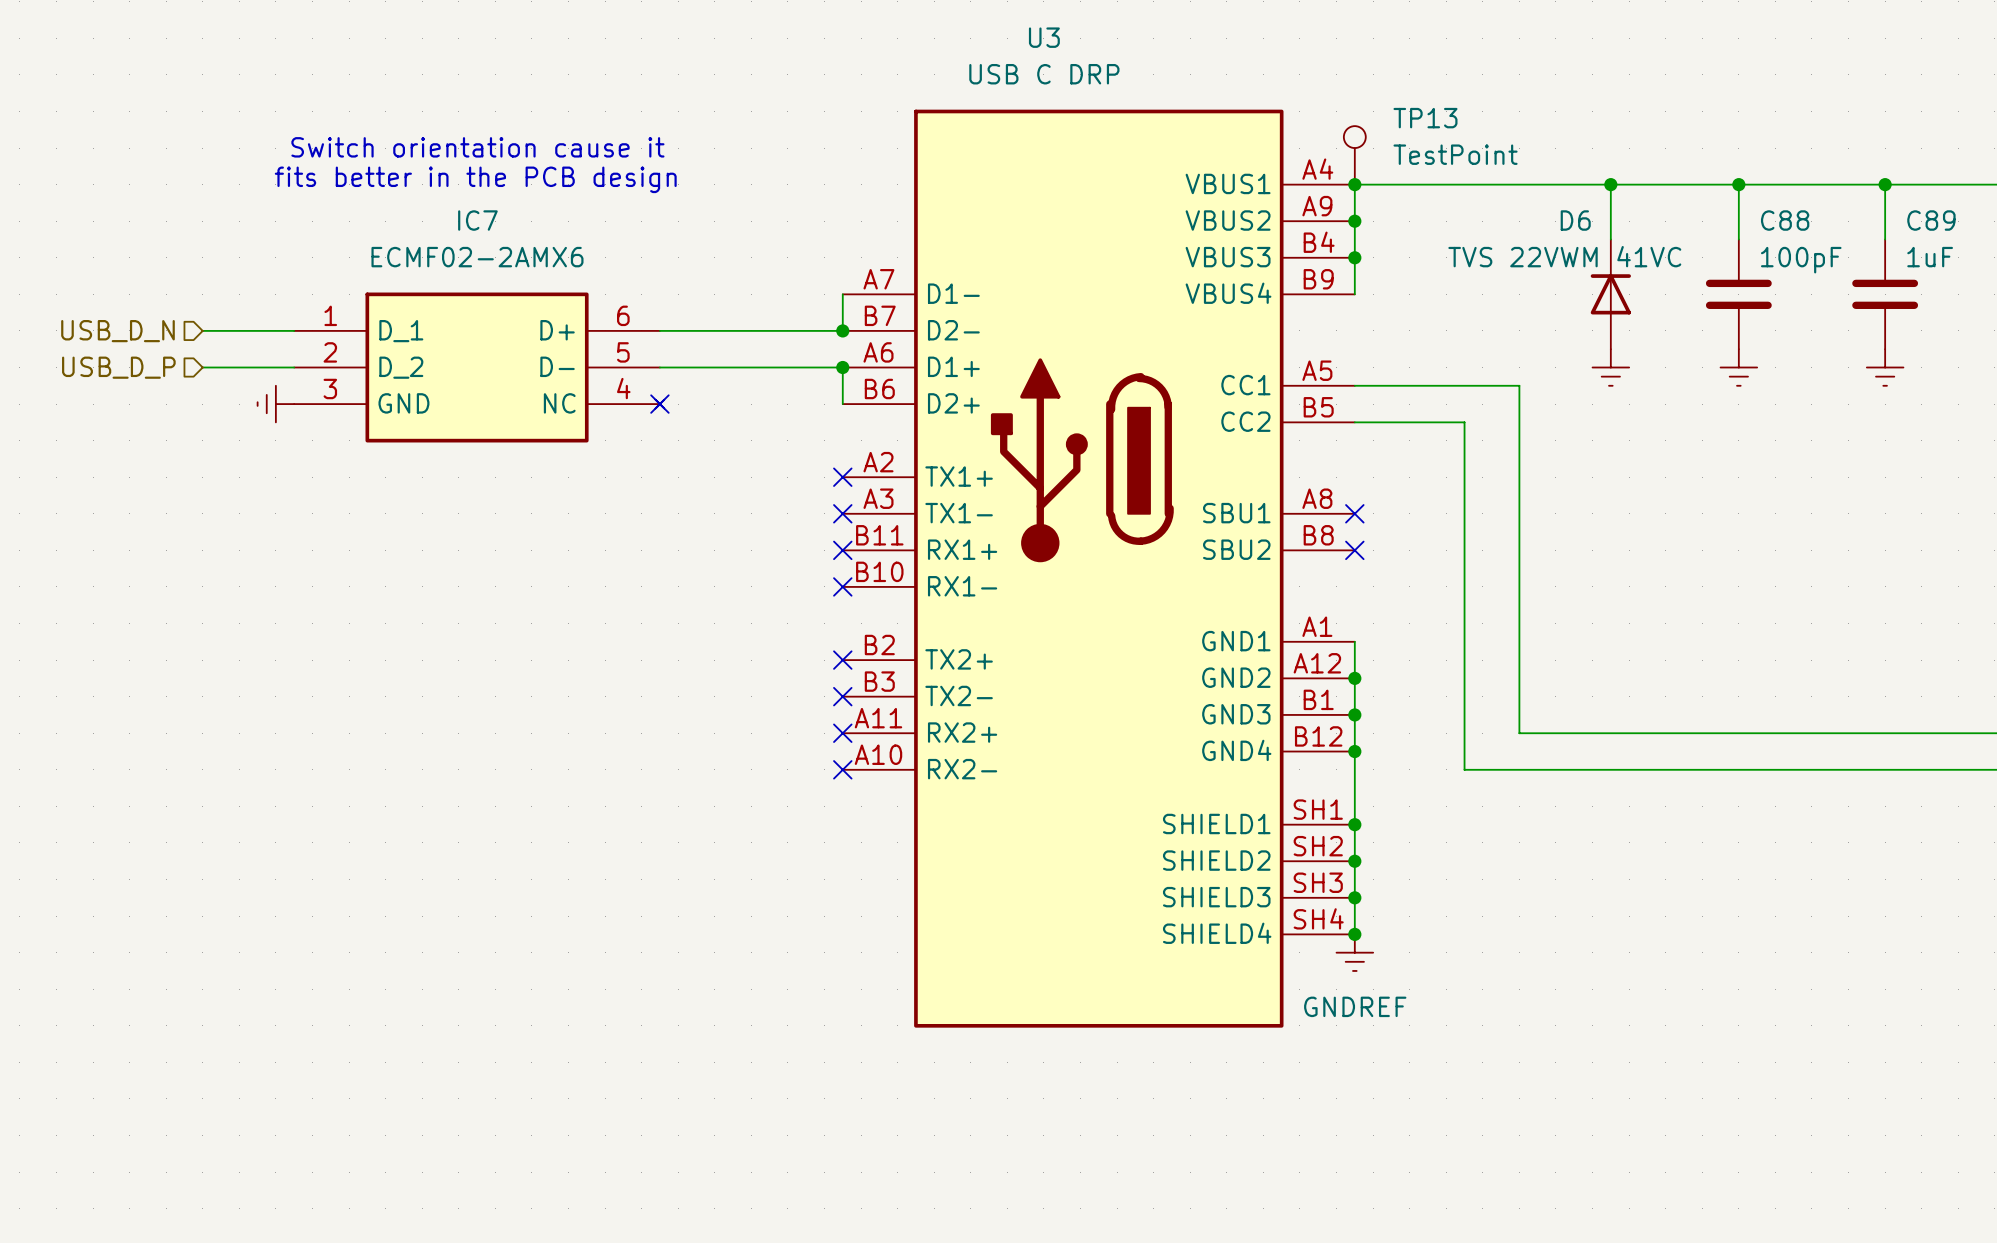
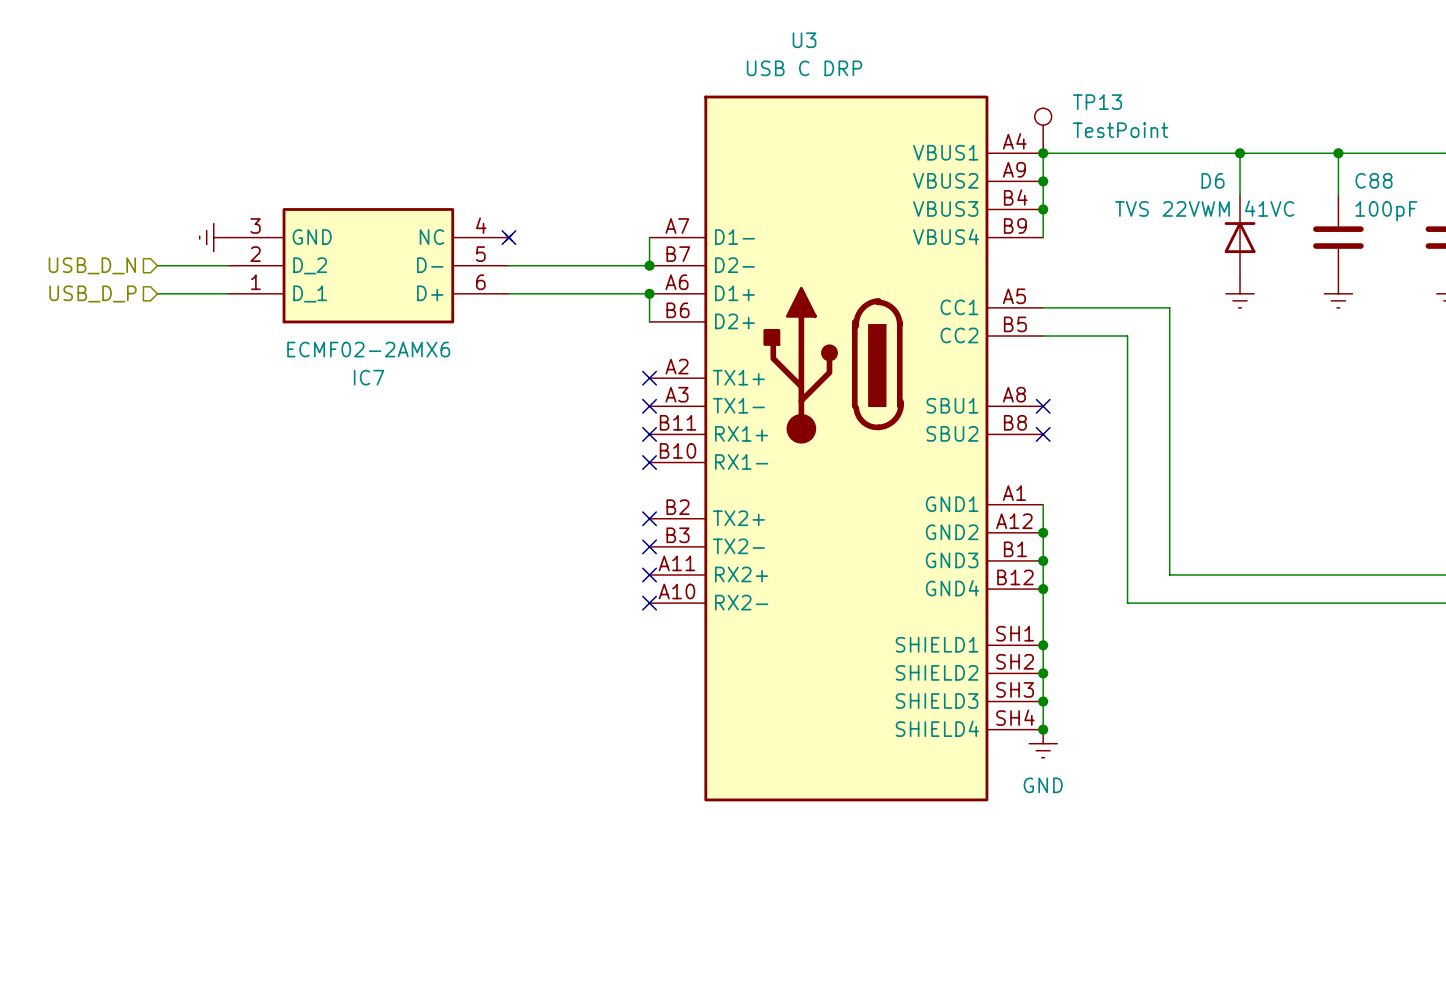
text: Switch orientation cause it (477, 147) -> none
text: fits better in the PCB design (475, 179) -> none
no-connect mark: none -> (508, 237)
IC7 flip: as is (514, 367) -> up-down (397, 265)
power symbol position: (275, 404) -> (213, 237)
no-connect mark: (659, 404) -> none
power symbol: GNDREF (1354, 952) -> GND (1043, 743)

